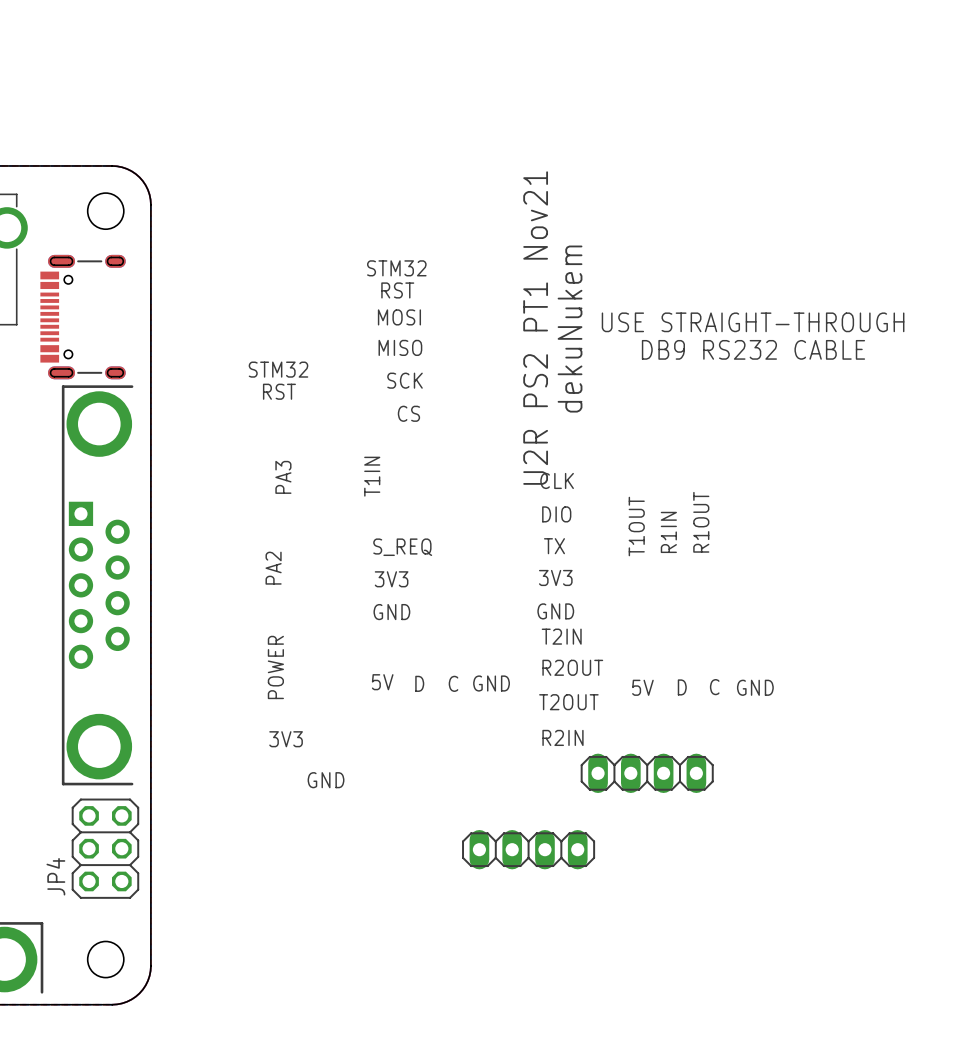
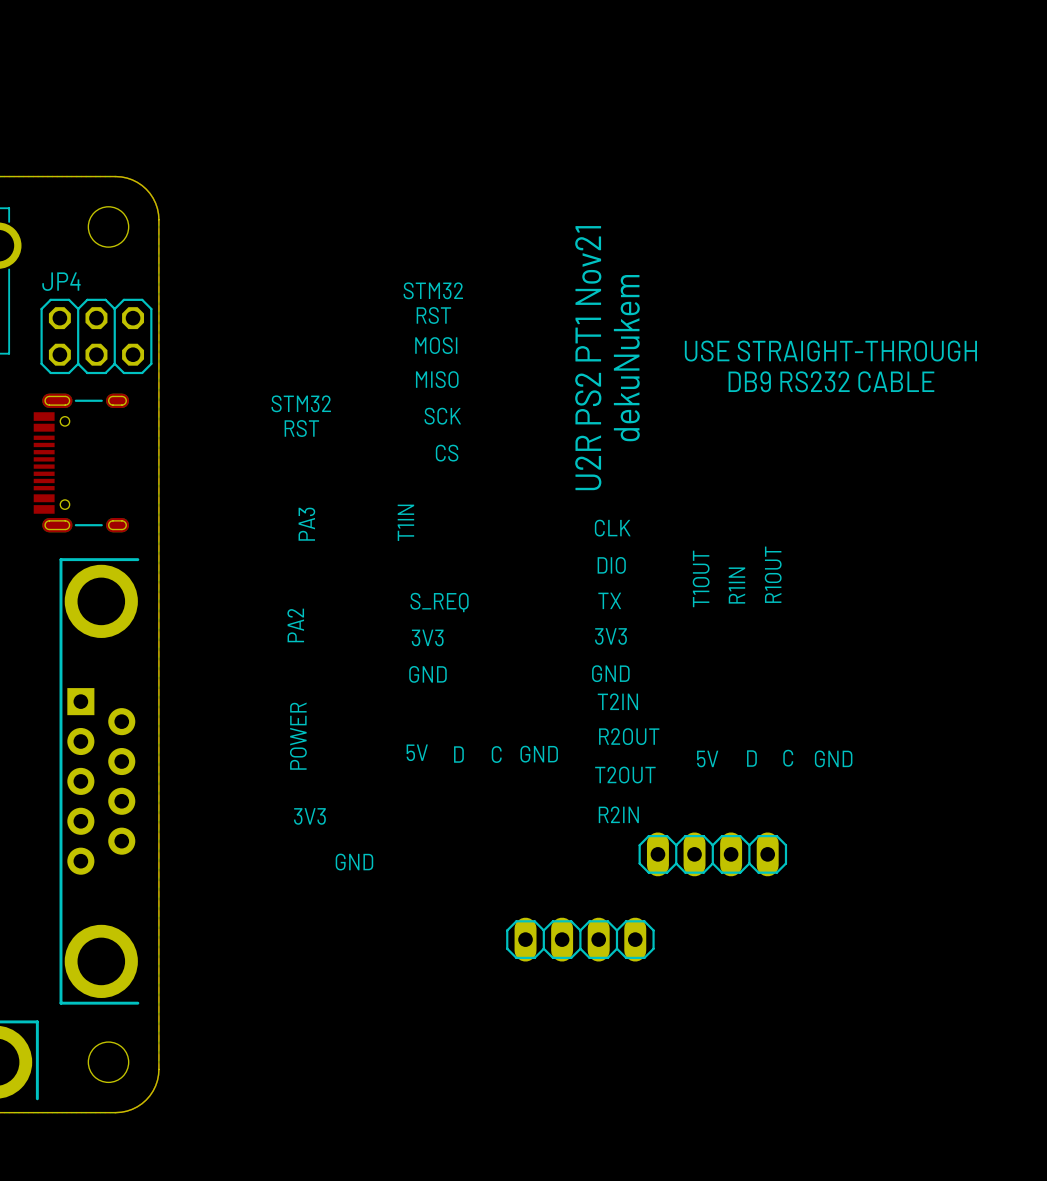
part position: (83, 317) -> (81, 462)
part position: (97, 585) -> (99, 781)
JP4 rotation: 0° (105, 848) -> 90° clockwise (96, 336)
JP4 position: (105, 848) -> (96, 336)

